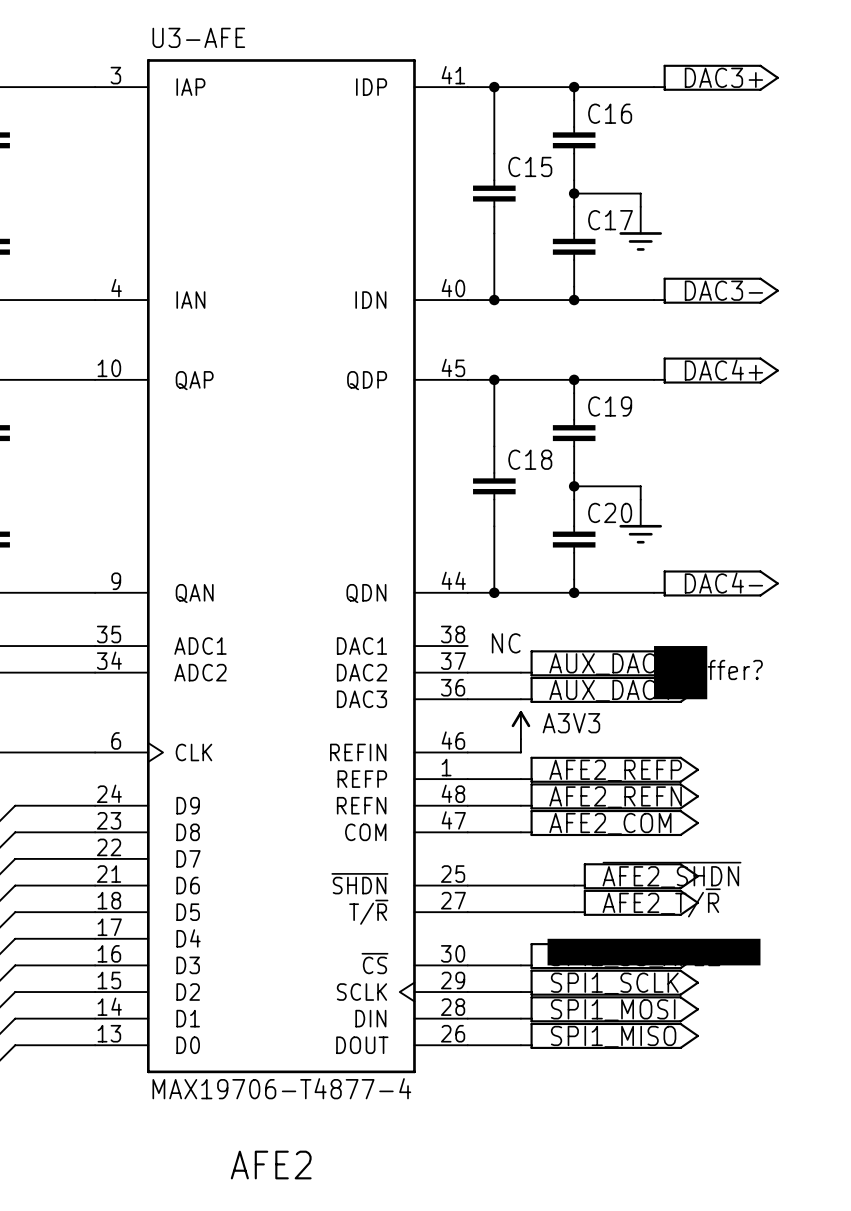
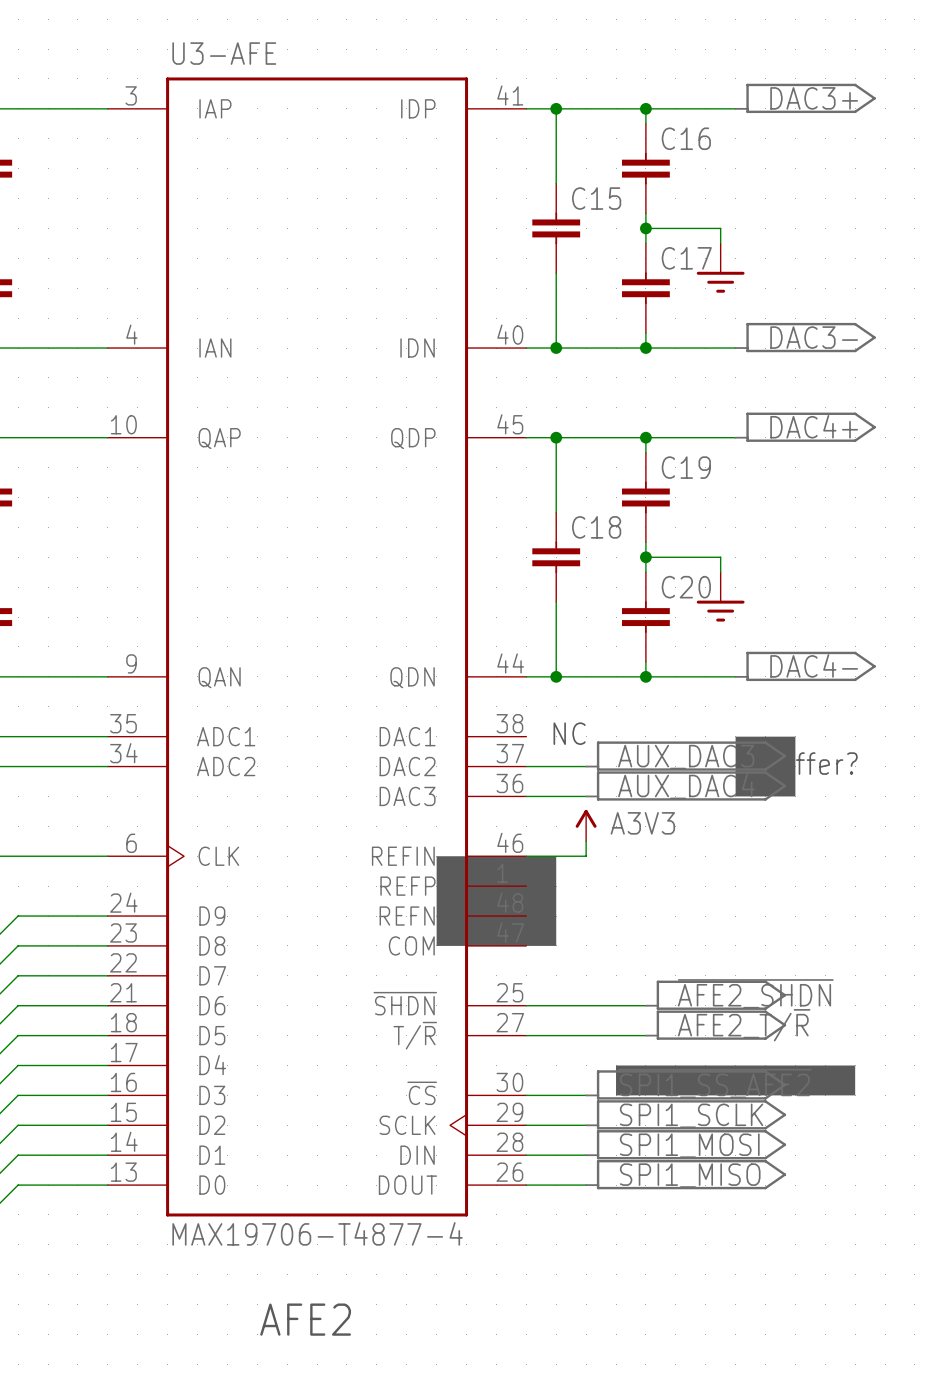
drawing: none -> [436, 856, 557, 946]
part: (609, 769) -> none
label: AFE2_REFP (615, 770) -> none
wire: (467, 779) (520, 779) -> none
part: (609, 796) -> none
label: AFE2_REFN (615, 797) -> none
wire: (467, 805) (520, 805) -> none
part: (609, 823) -> none
label: AFE2_COM (610, 823) -> none
wire: (467, 832) (520, 832) -> none

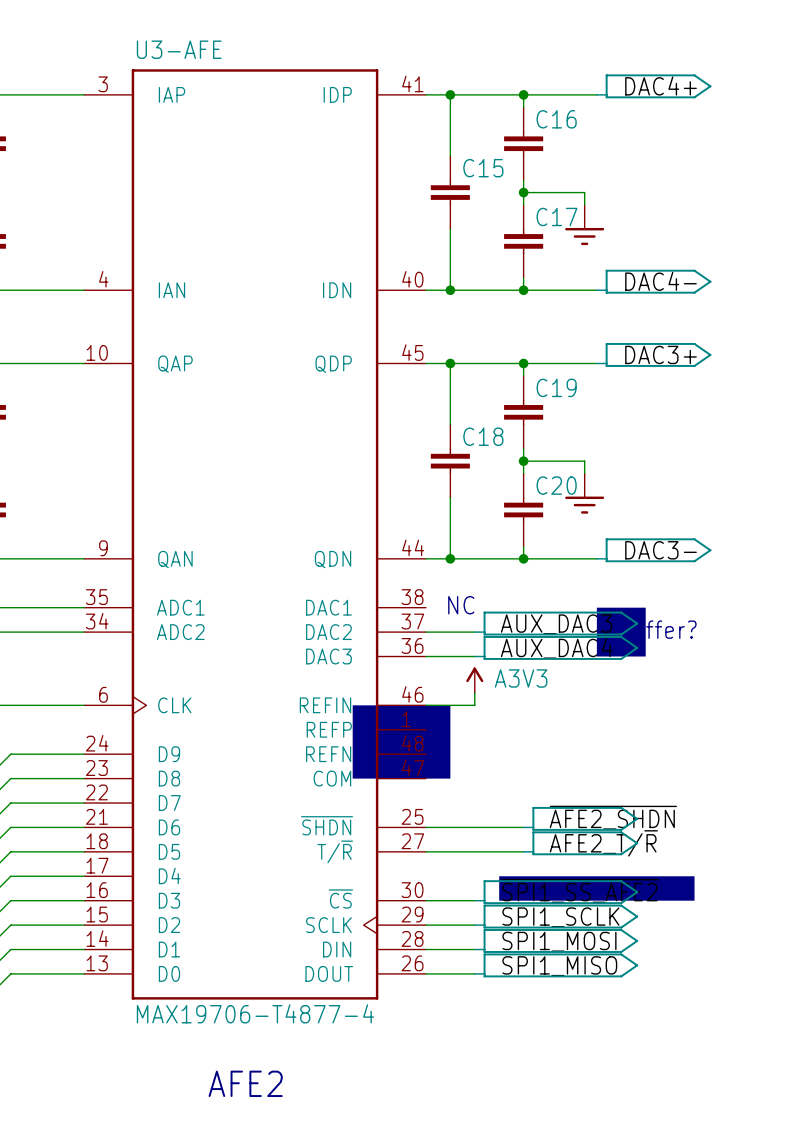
label: DAC3+ (814, 98) -> DAC4+ (661, 85)
label: DAC3- (814, 337) -> DAC4- (661, 281)
label: DAC4+ (814, 426) -> DAC3+ (661, 354)
label: DAC4- (814, 665) -> DAC3- (661, 550)

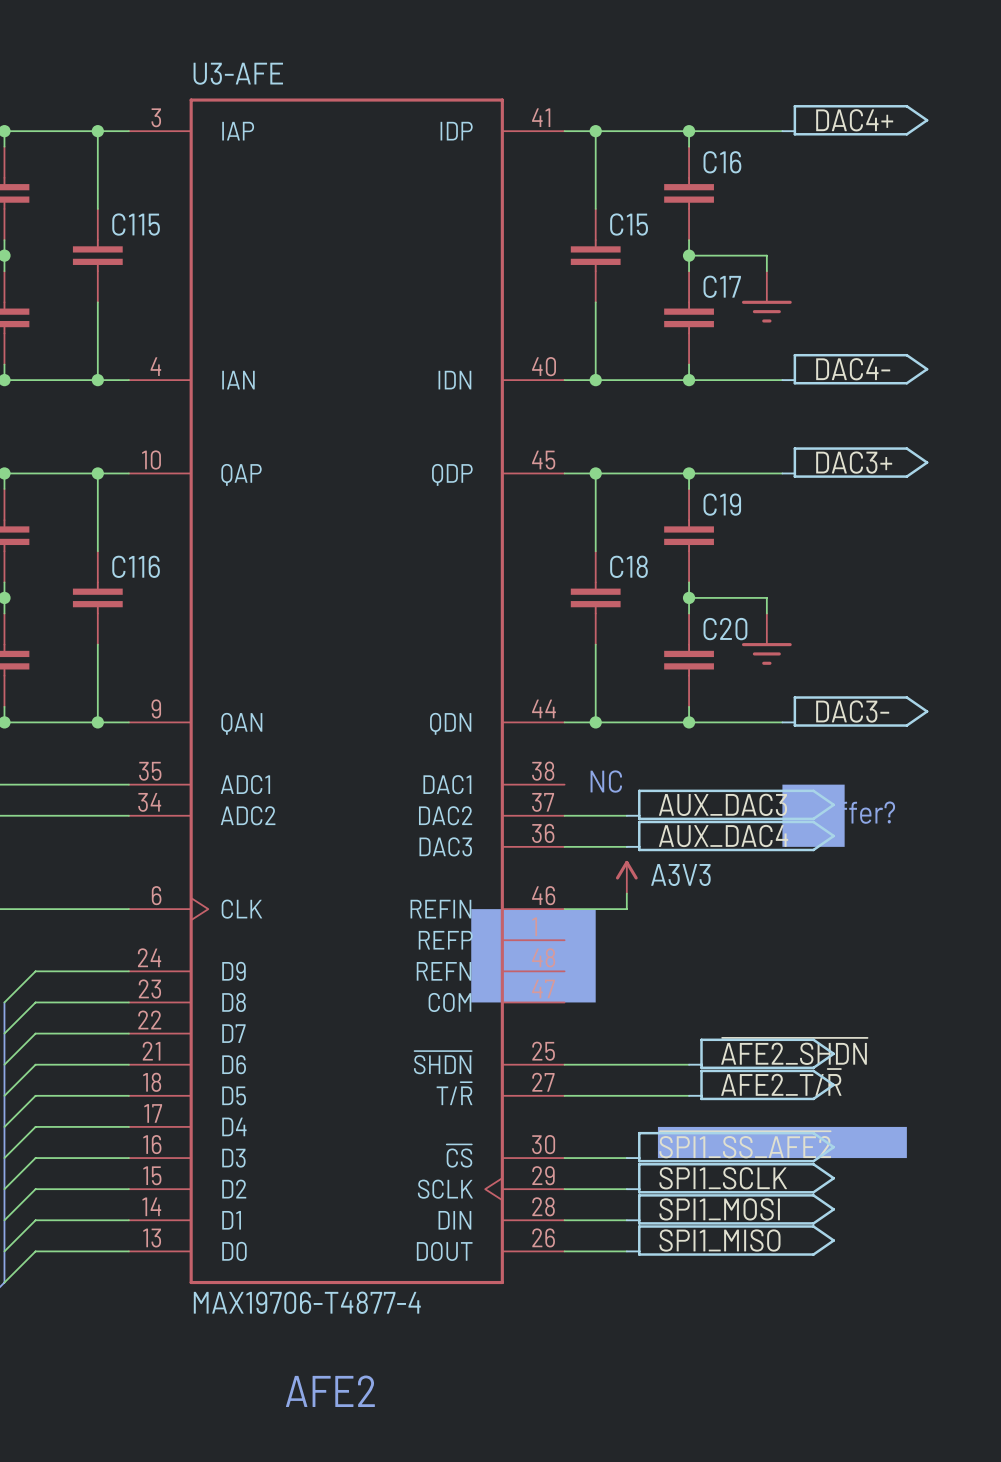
wire: none -> (97, 131) (97, 208)
junction: none -> (97, 131)
C115: none -> (97, 255)
wire: none -> (97, 302) (97, 380)
junction: none -> (97, 380)
wire: none -> (97, 473) (97, 551)
junction: none -> (97, 473)
C116: none -> (97, 597)
wire: none -> (97, 644) (97, 722)
junction: none -> (97, 722)

